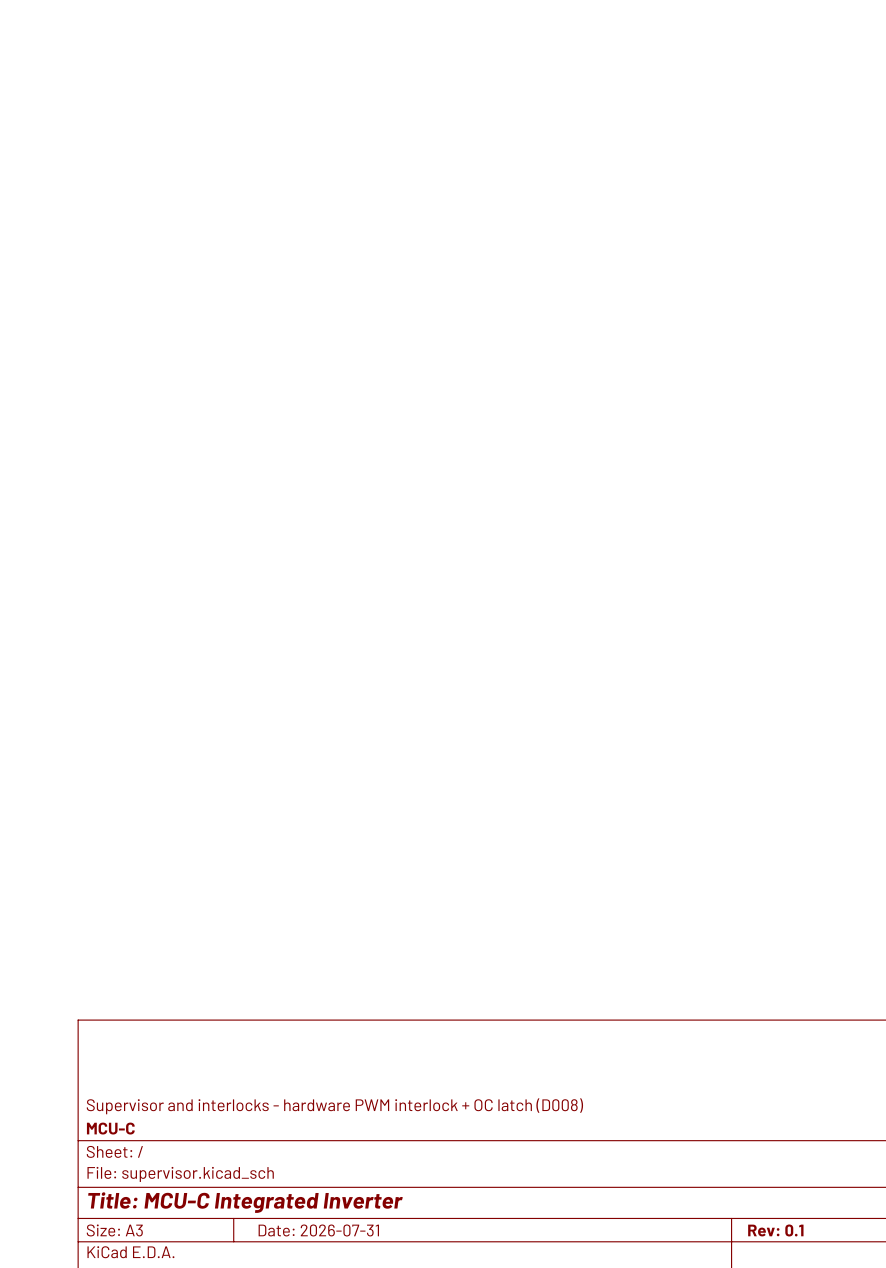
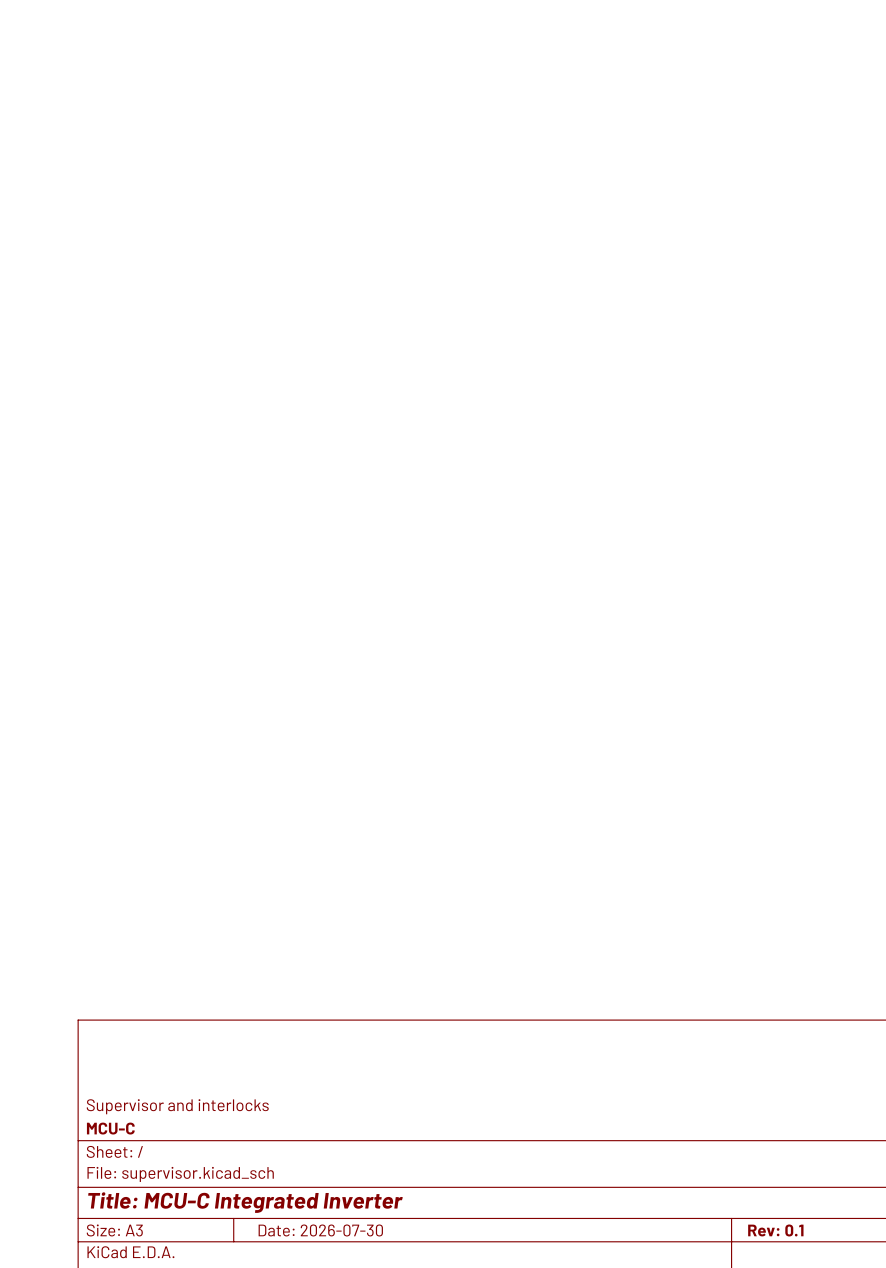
title block: Supervisor and interlocks - hardware PWM interlock + OC latch (D008) (334, 1106) -> Supervisor and interlocks (177, 1106)
title block: Date: 2026-07-31 (318, 1230) -> Date: 2026-07-30 (320, 1230)

